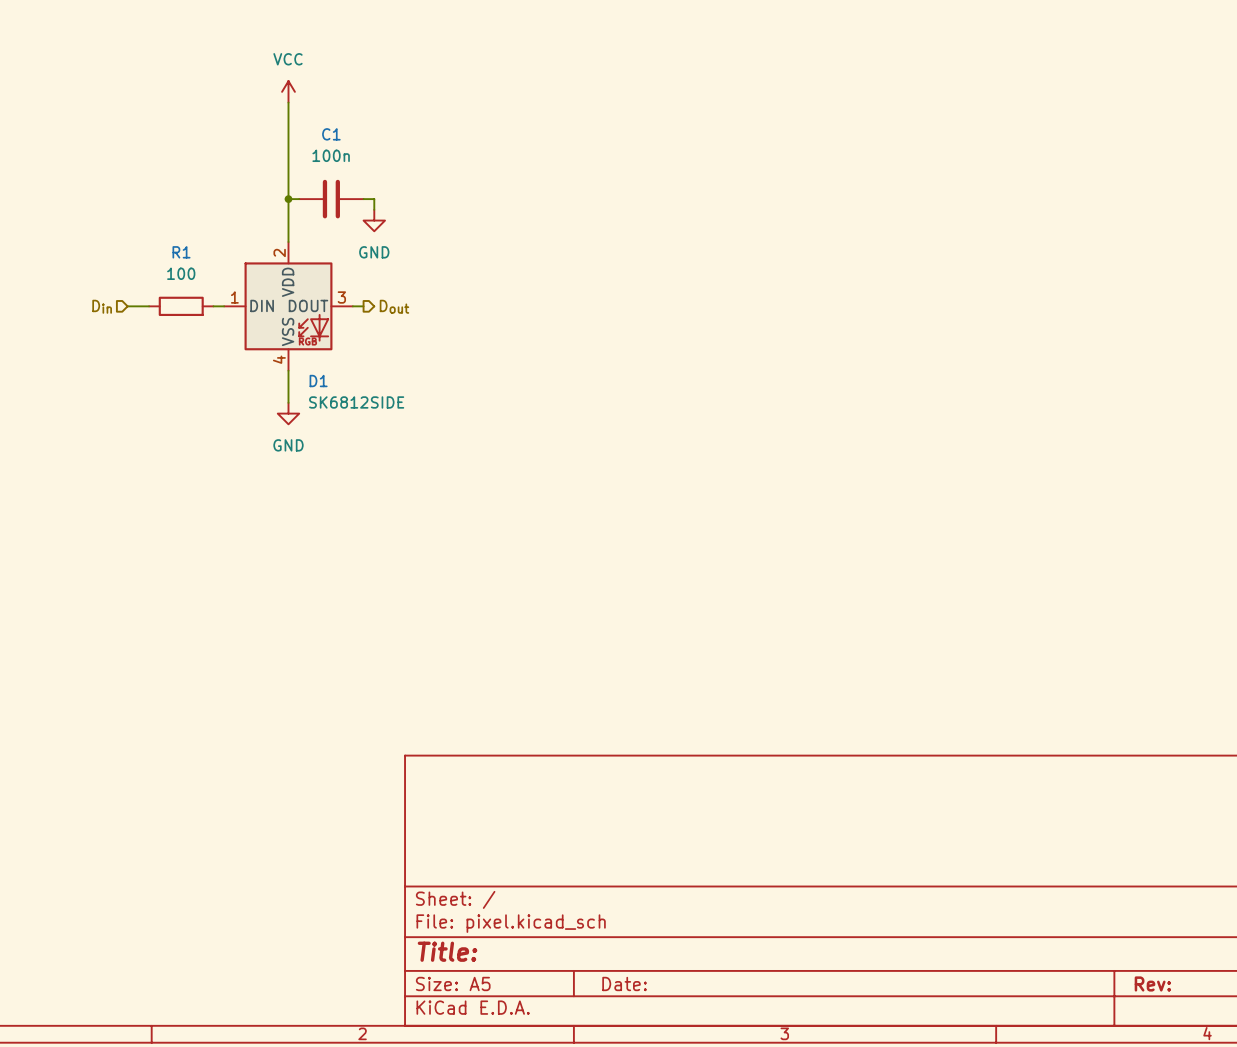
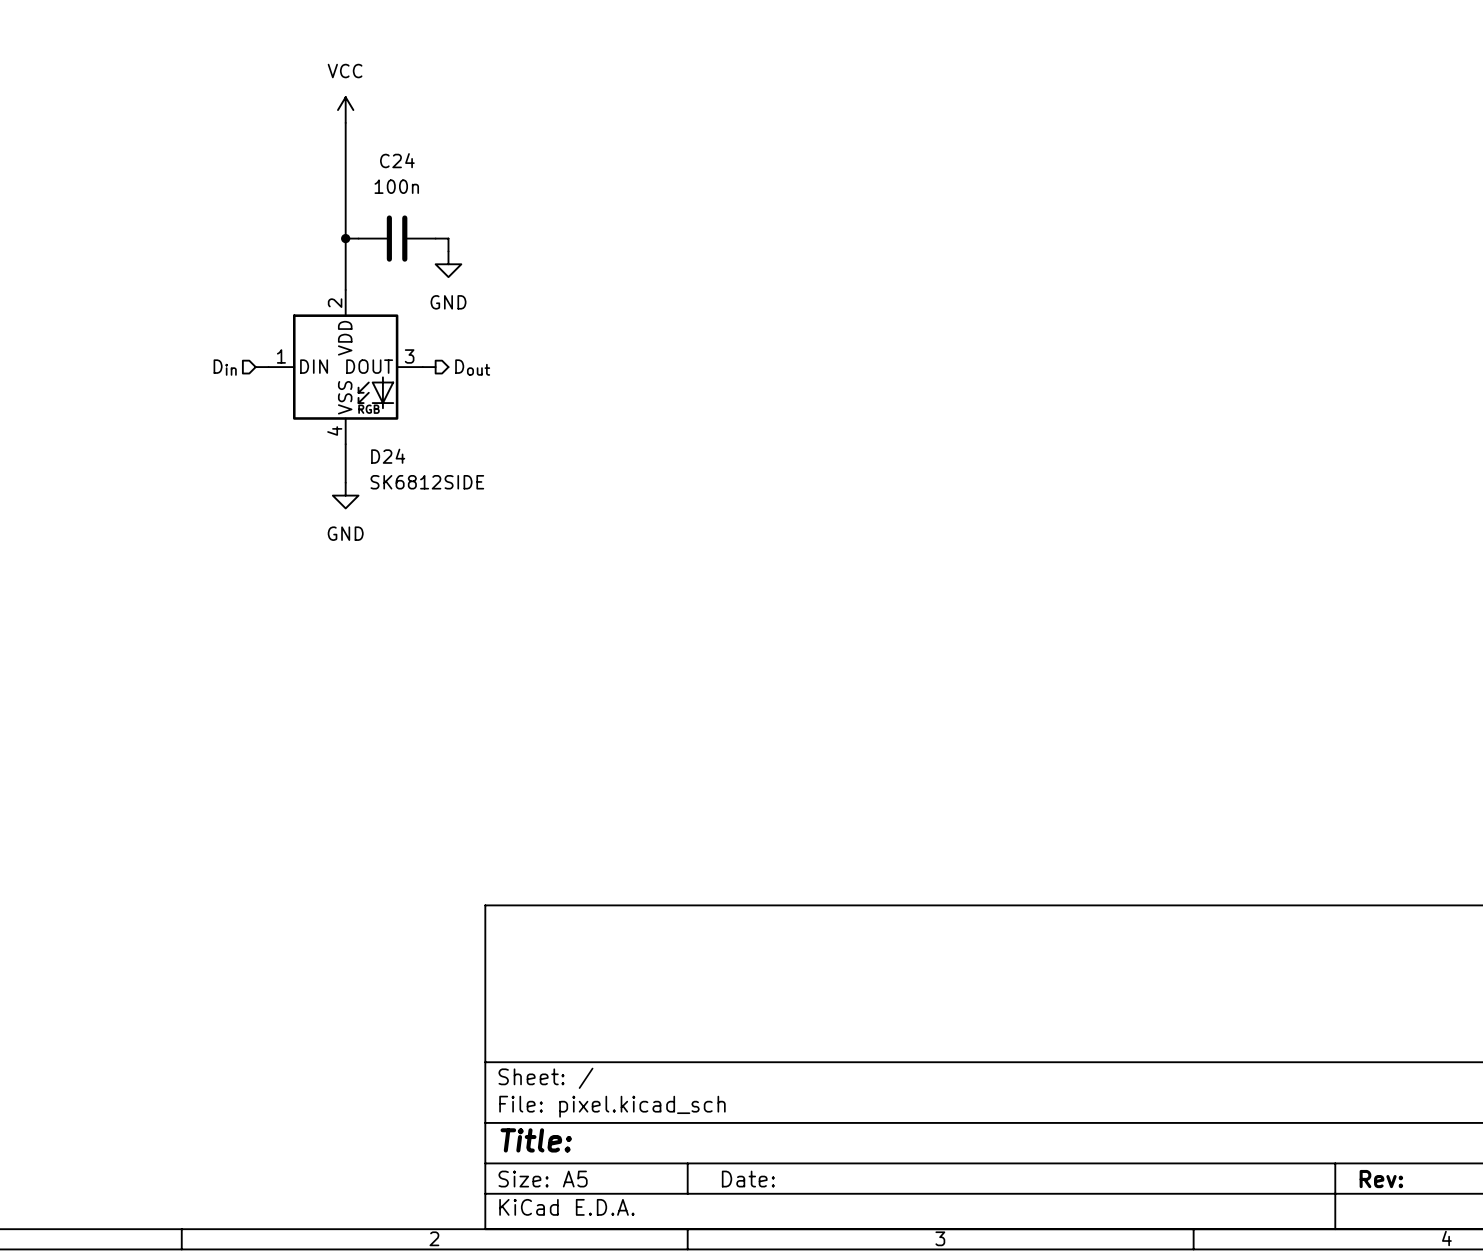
C1 name: C1 (331, 134) -> C24 (397, 160)
hierarchical label position: Din (102, 306) -> Din (225, 367)
wire: (127, 306) (149, 306) -> none
R1: 100 (181, 306) -> none
D1 name: D1 (318, 381) -> D24 (388, 456)

